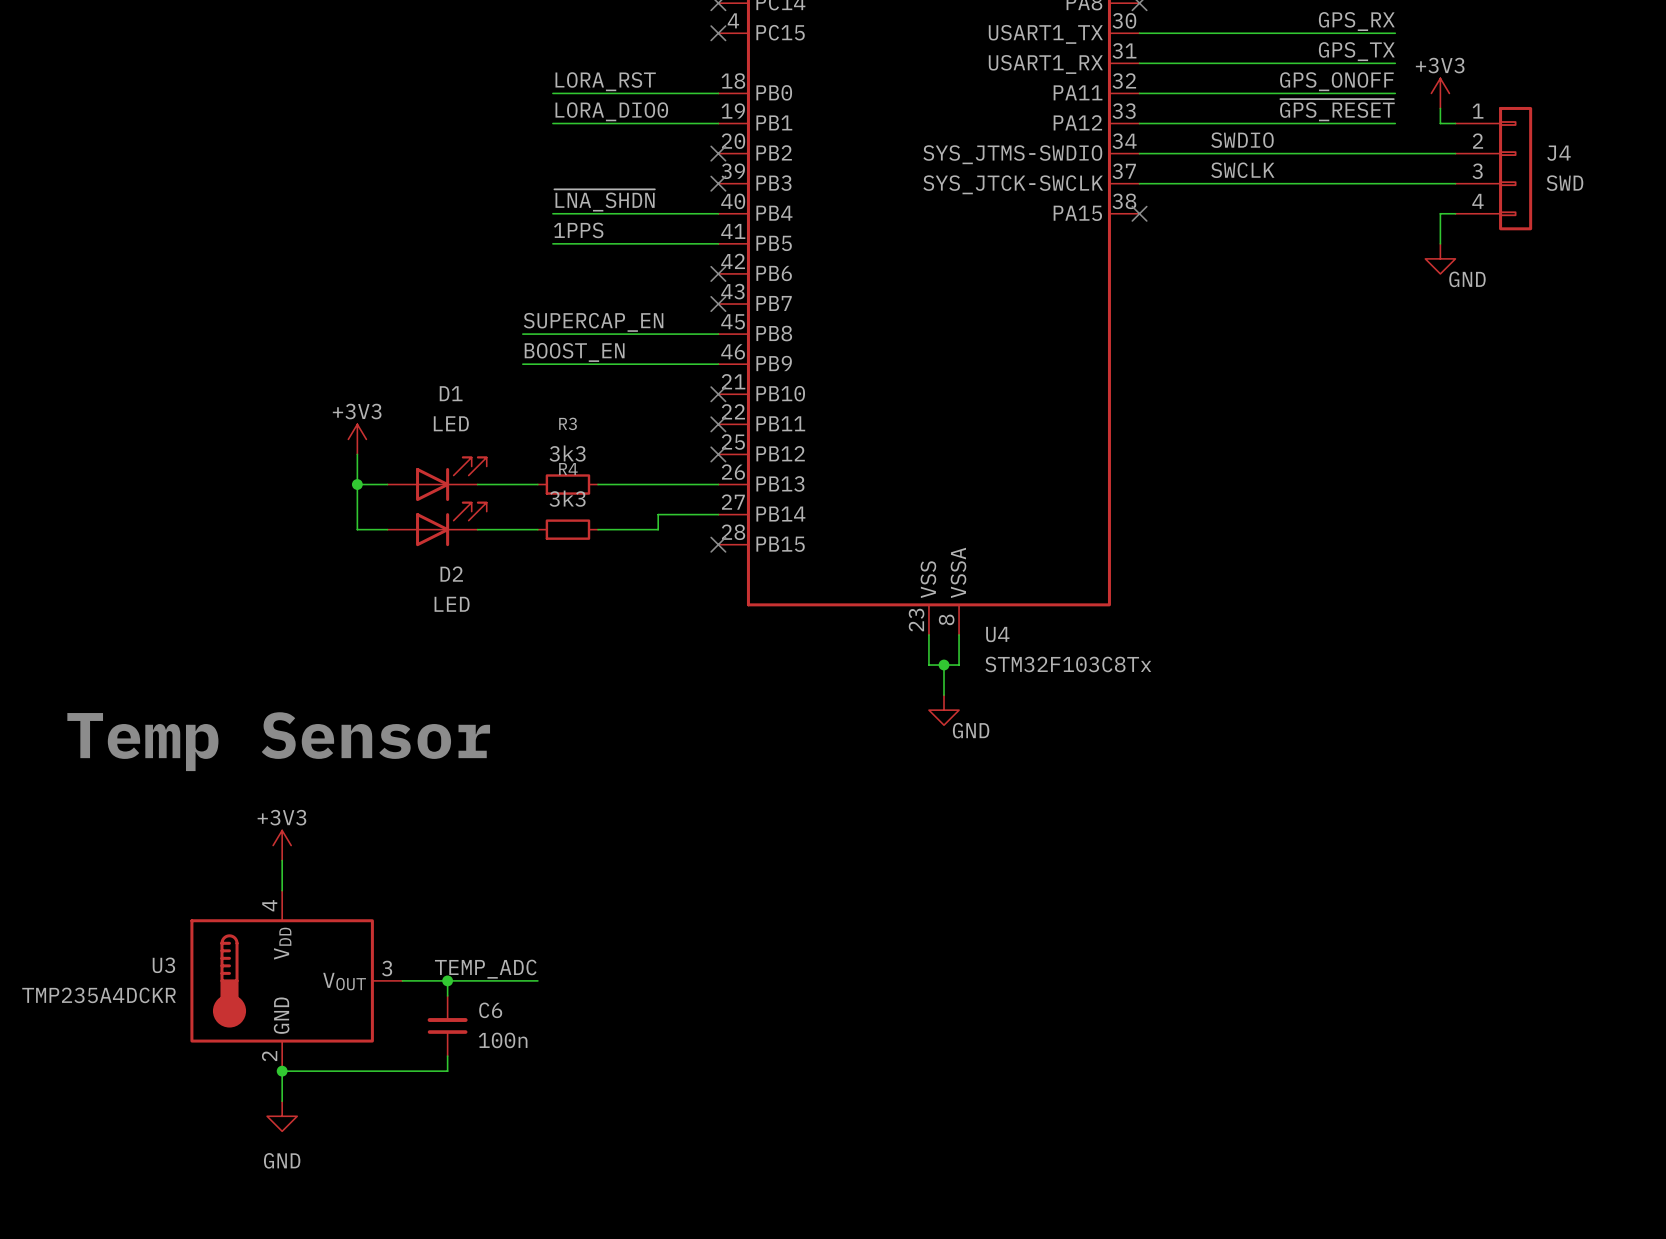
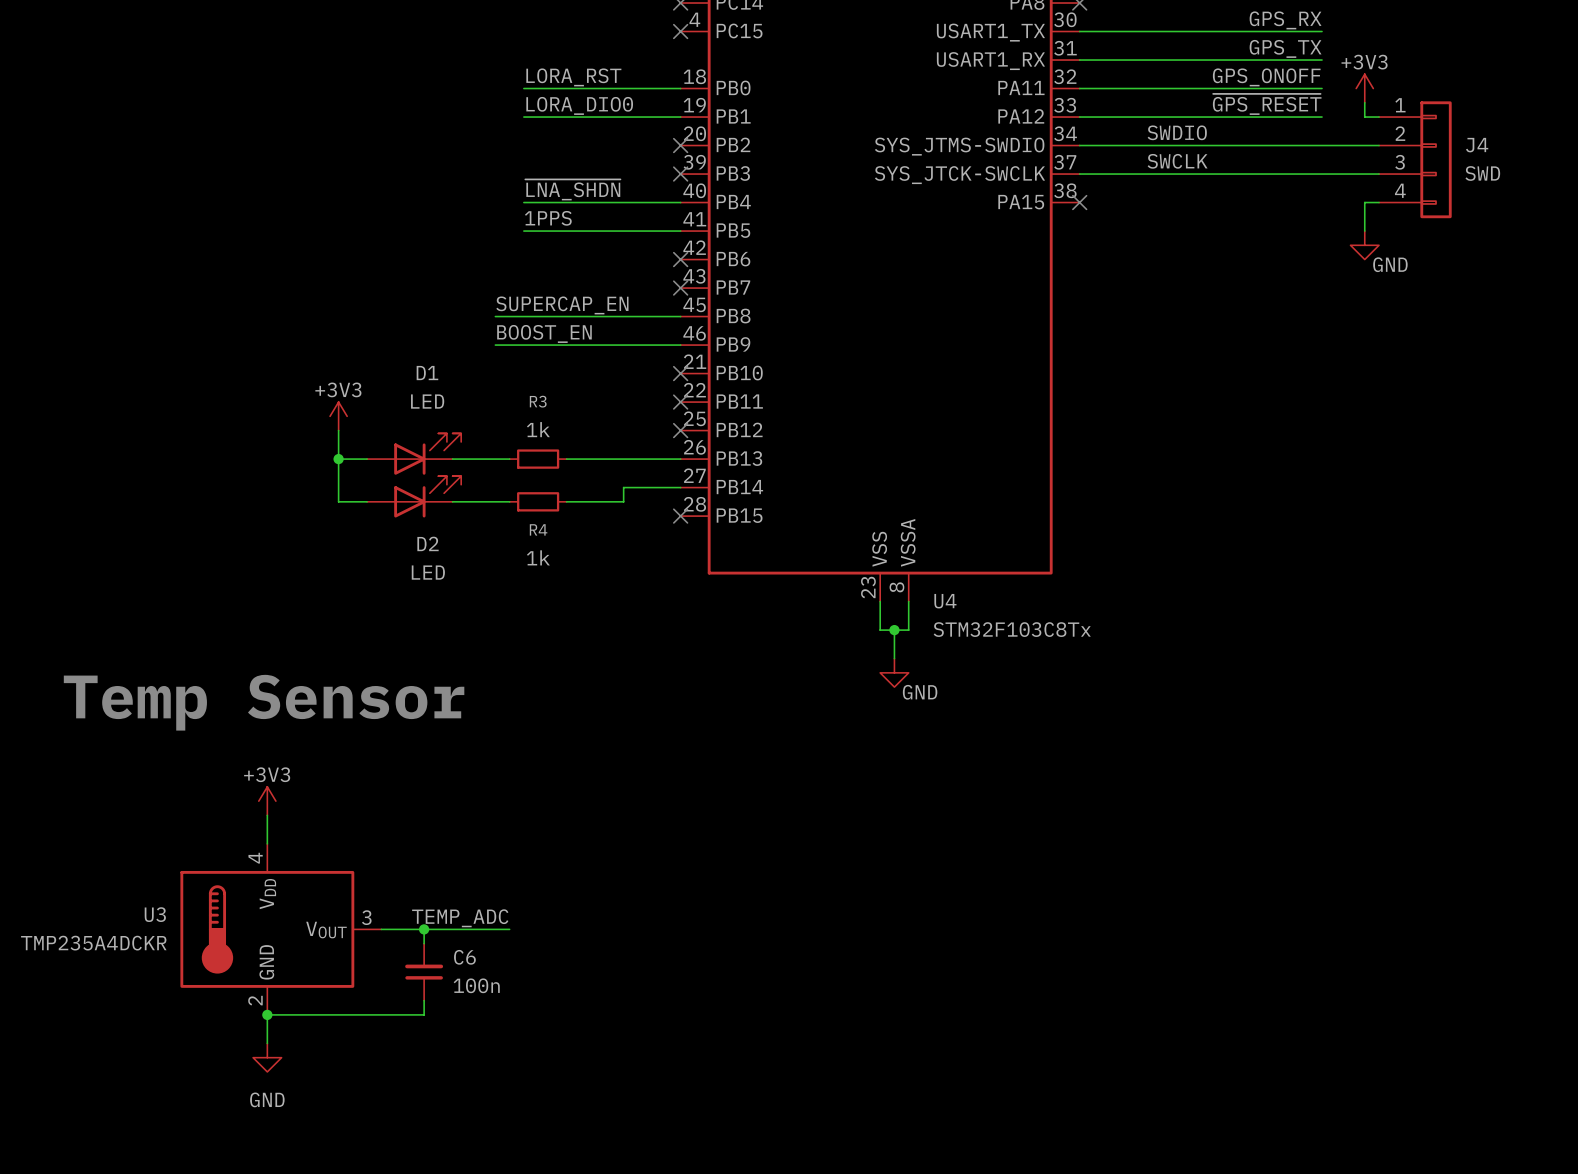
R3 value: 3k3 (567, 453) -> 1k (538, 429)
R4 name position: R4 (568, 469) -> R4 (538, 529)
R4 value: 3k3 (567, 498) -> 1k (538, 557)

